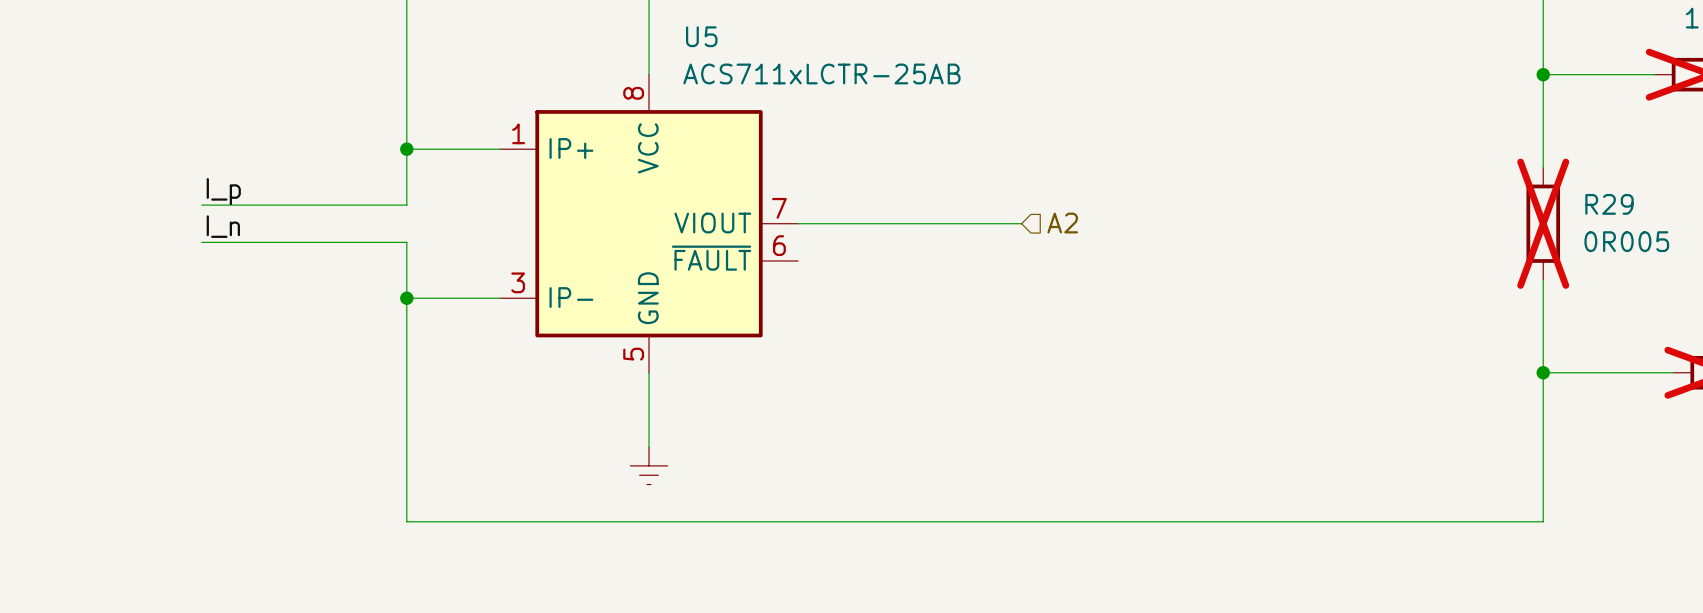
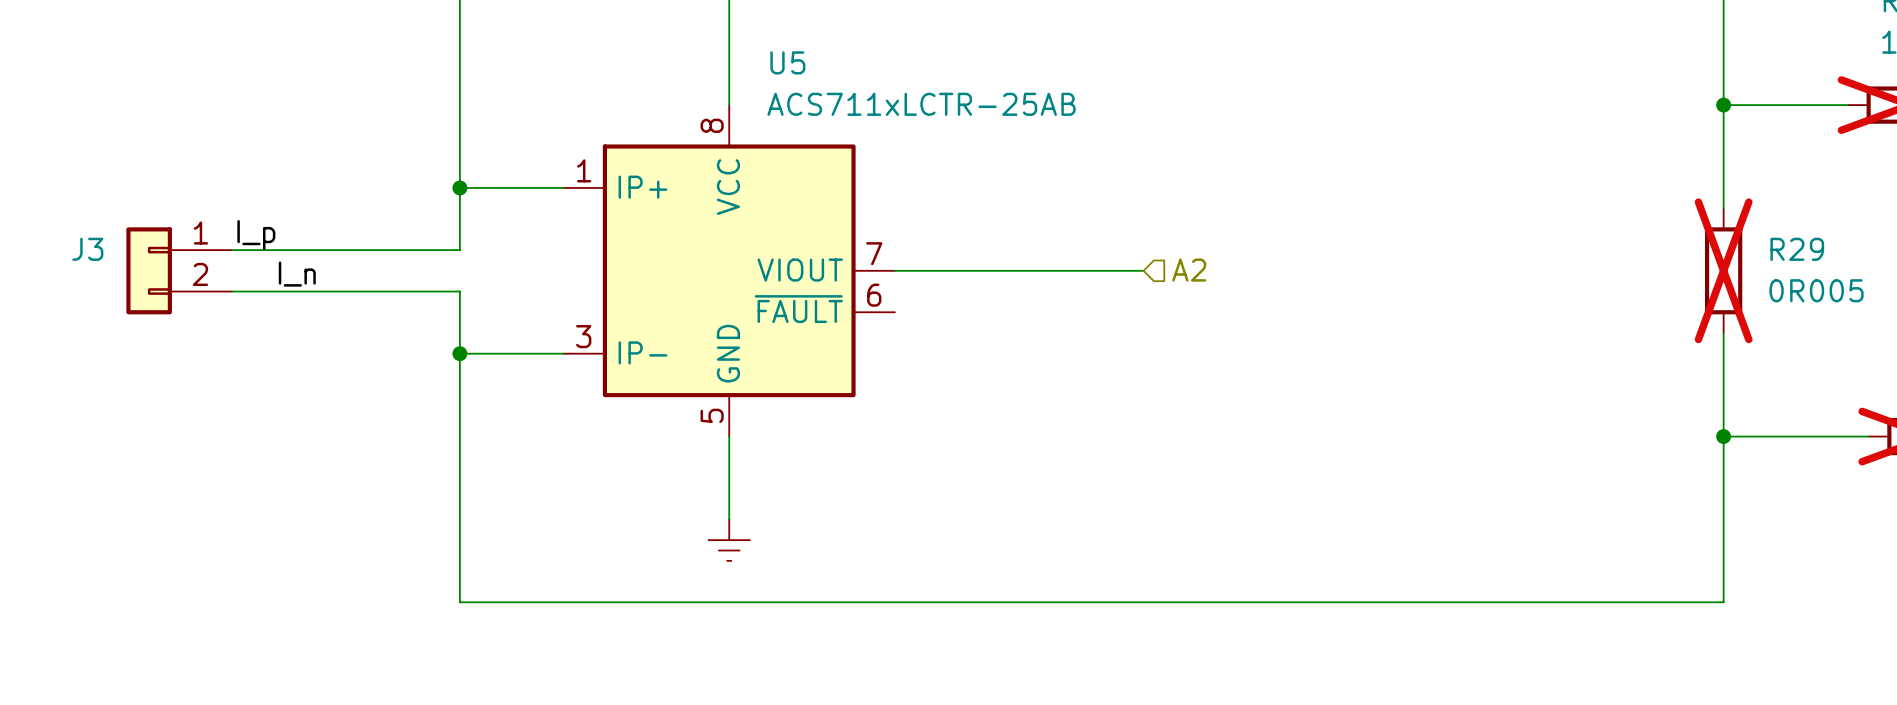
J3: none -> (179, 270)
label position: I_n (223, 226) -> I_n (297, 274)

